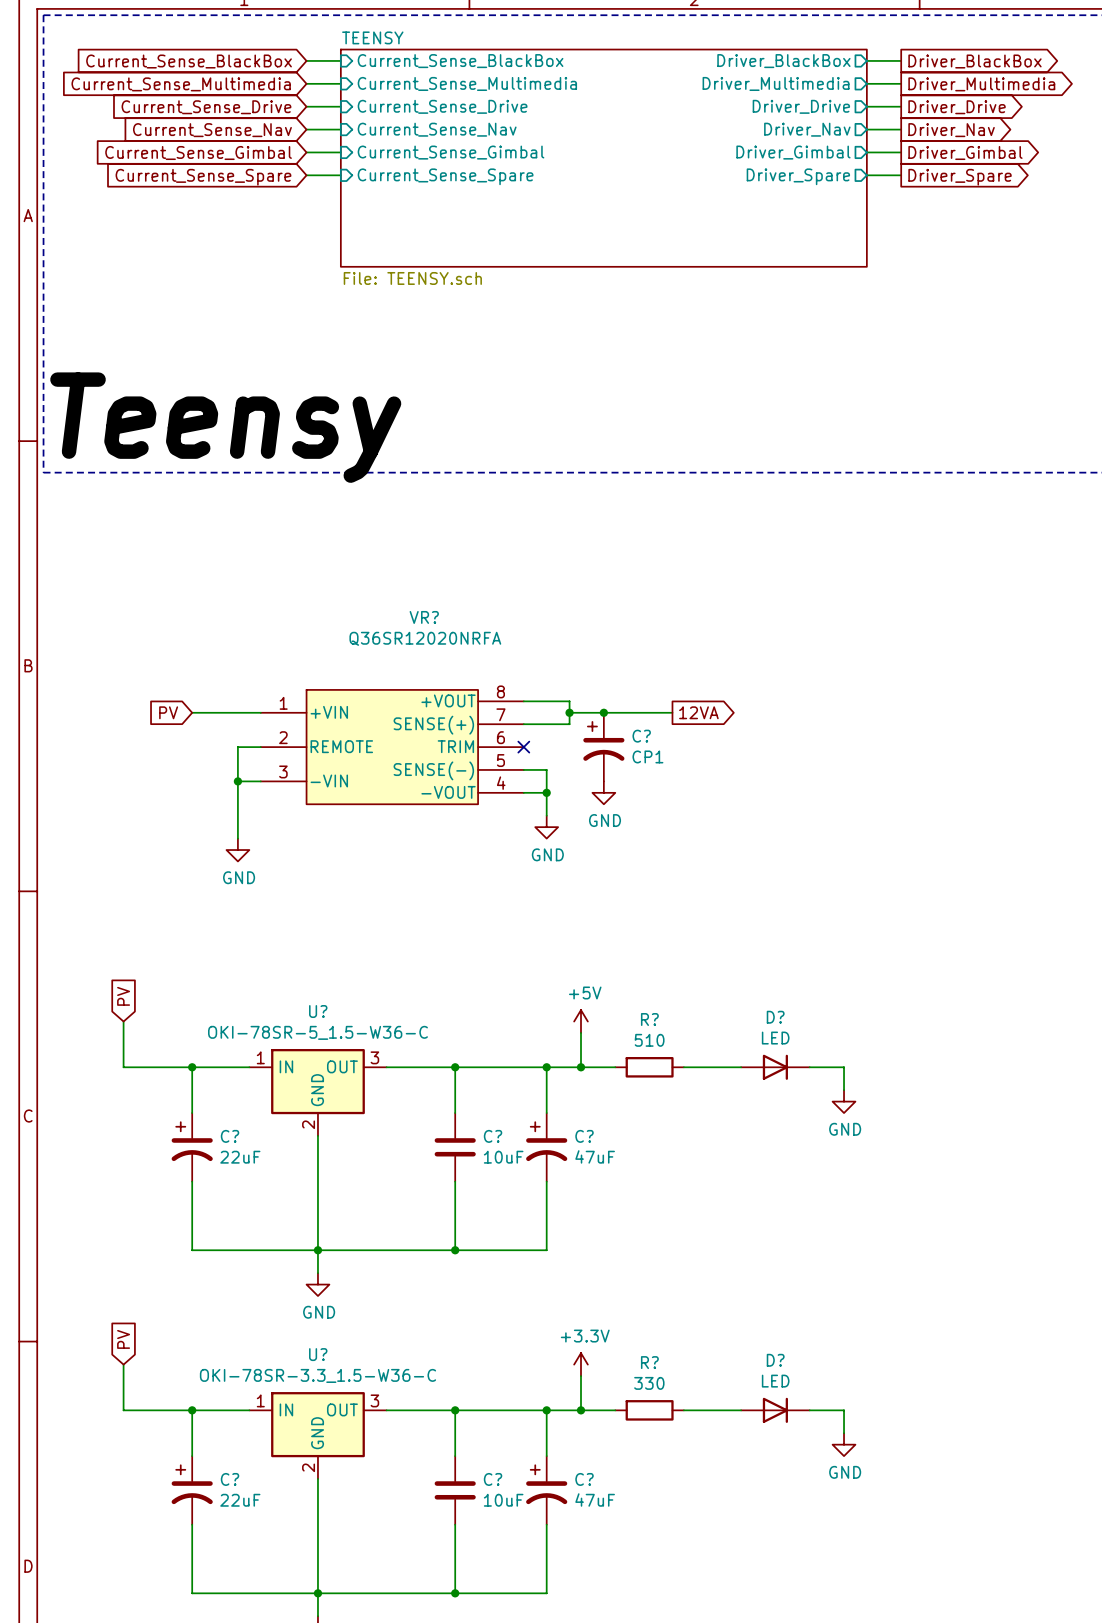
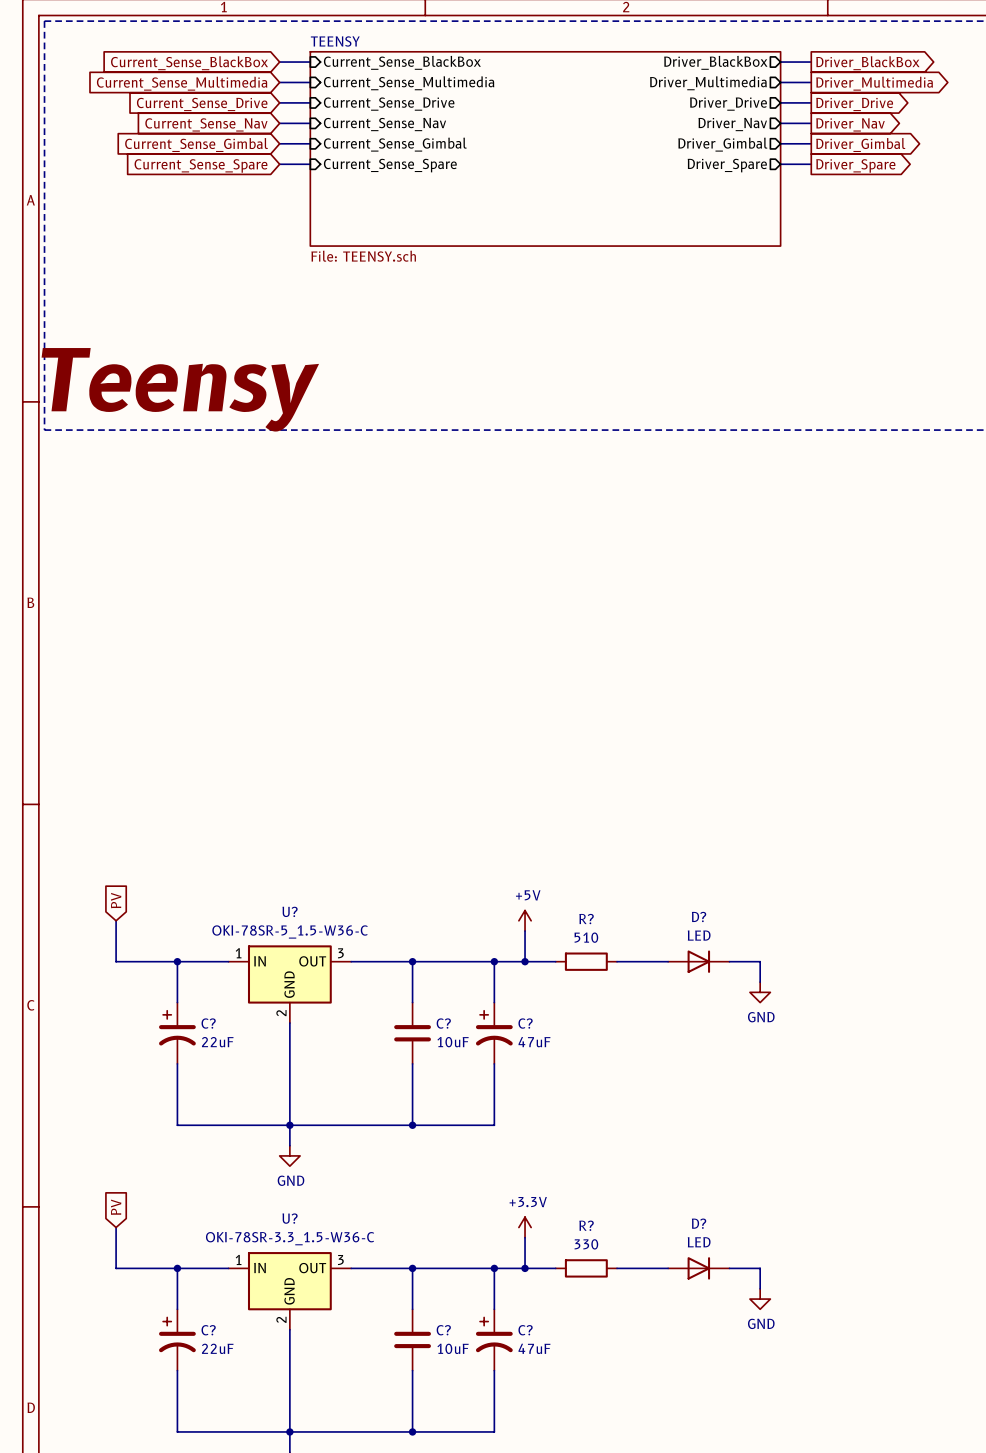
wire: (523, 701) (569, 701) (569, 724) (523, 724) -> none
global label: PV (168, 712) -> none
wire: (192, 712) (260, 712) -> none
wire: (569, 712) (672, 712) -> none
junction: (569, 712) -> none
junction: (603, 712) -> none
global label: 12VA (698, 712) -> none
VR?: Q36SR12020NRFA (426, 729) -> none
wire: (260, 747) (237, 747) (237, 838) -> none
no-connect mark: (523, 747) -> none
C?: CP1 (603, 747) -> none
wire: (523, 769) (546, 769) (546, 815) -> none
wire: (237, 781) (260, 781) -> none
junction: (237, 781) -> none
wire: (523, 792) (546, 792) -> none
junction: (546, 792) -> none
power symbol: GND (603, 792) -> none
power symbol: GND (546, 827) -> none
power symbol: GND (237, 850) -> none

